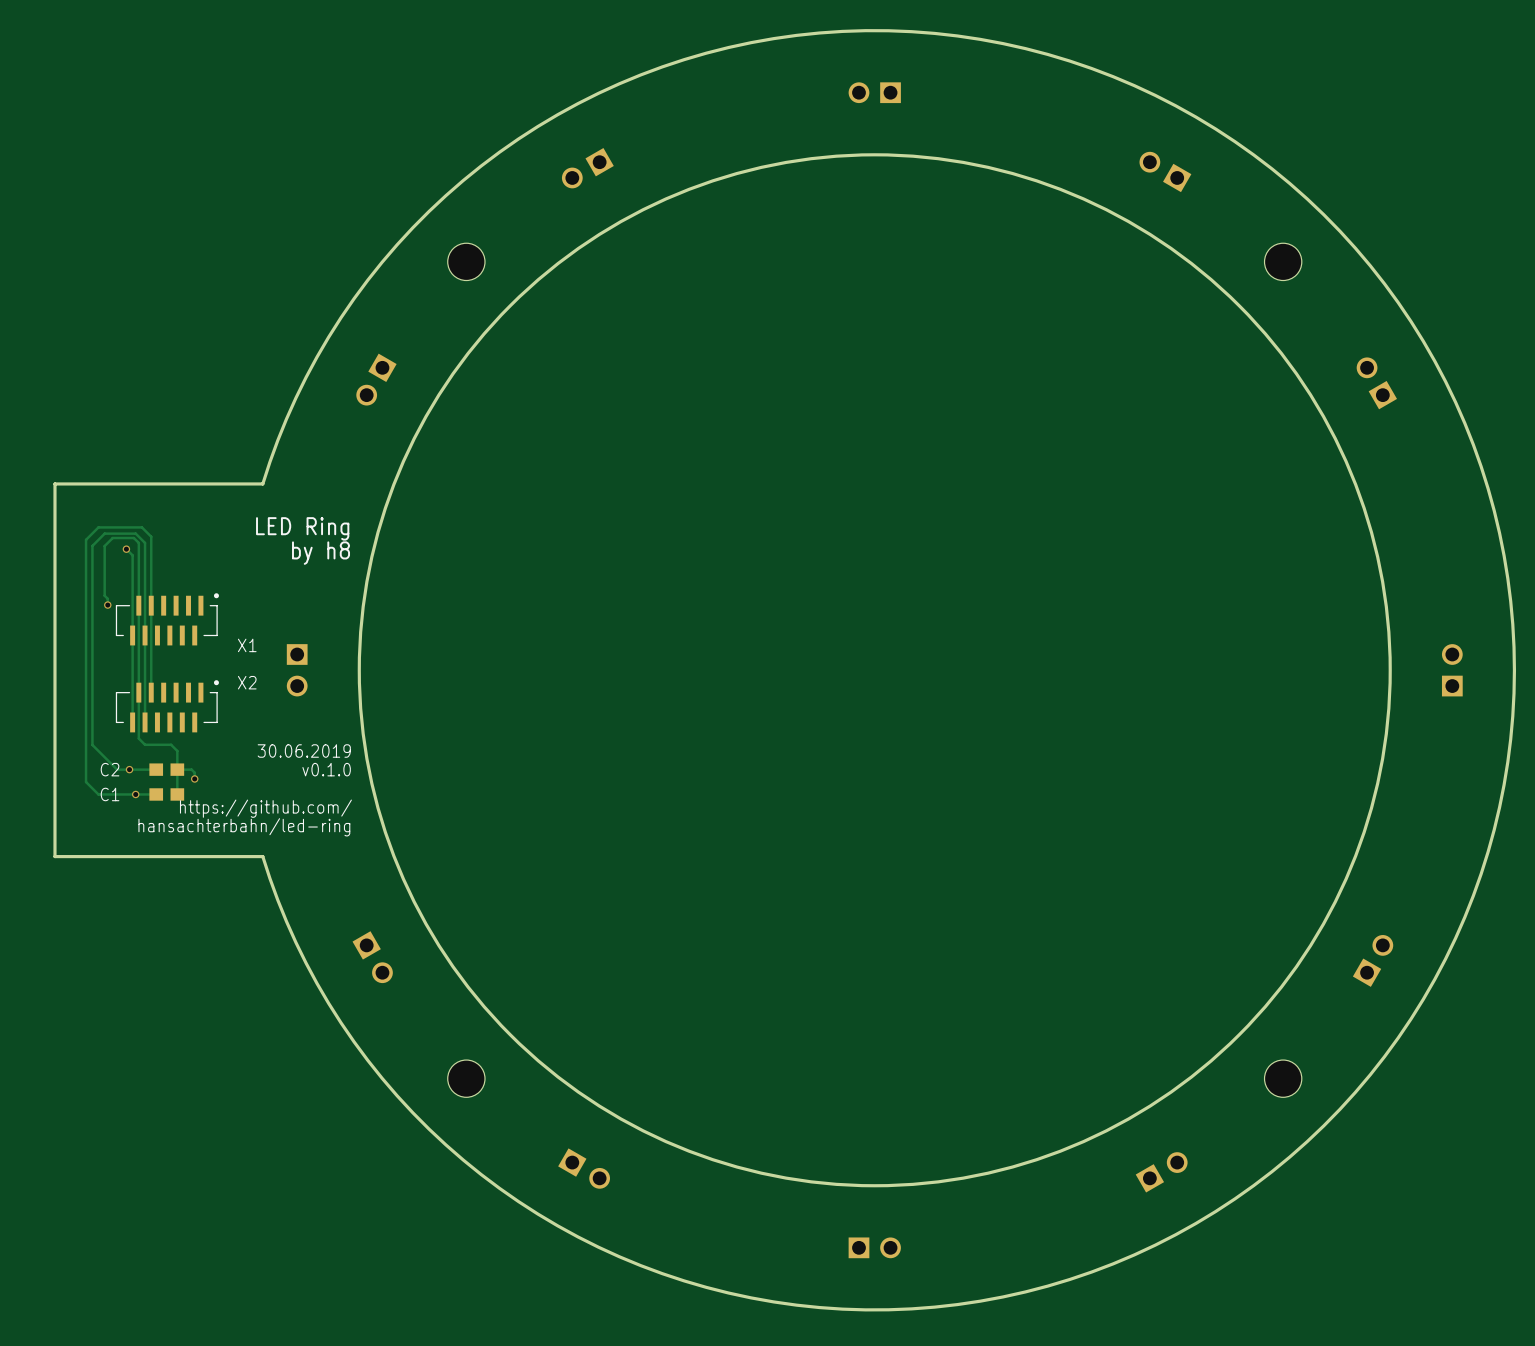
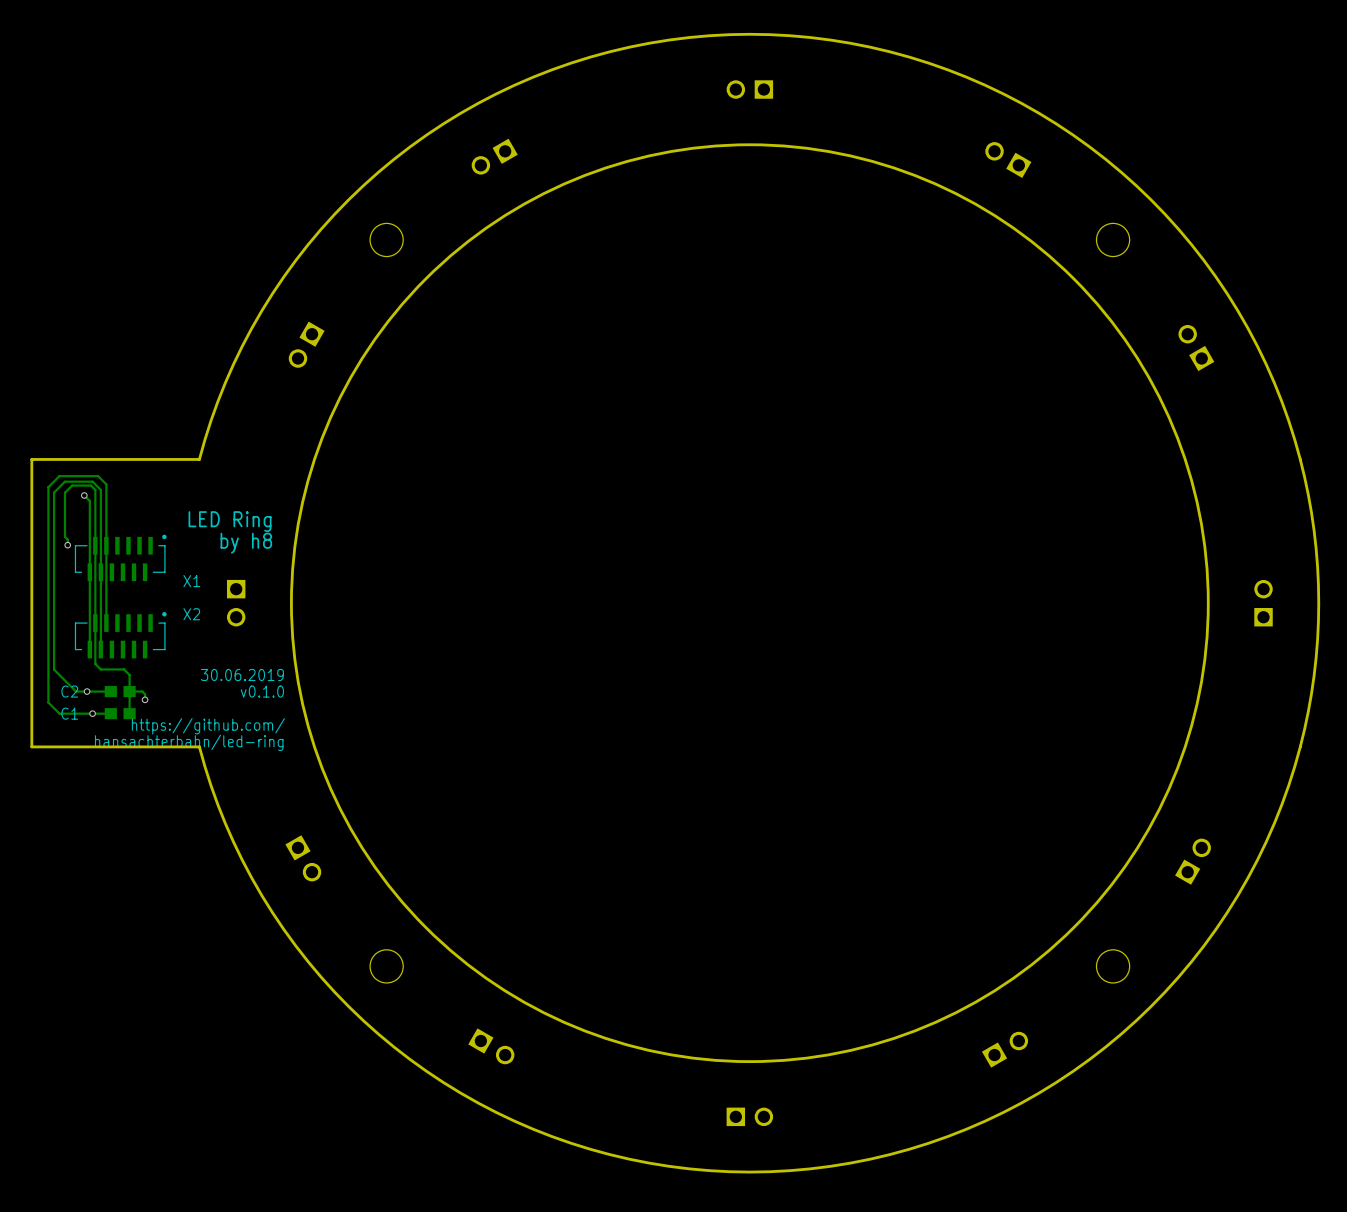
board edge: (262, 483) (54, 483) (54, 856) (262, 856) (286, 921) (317, 983) (341, 1022) (367, 1060) (412, 1112) (445, 1144) (481, 1174) (537, 1214) (598, 1247) (640, 1265) (684, 1280) (751, 1297) (796, 1305) (865, 1309) (934, 1307) (980, 1301) (1047, 1286) (1113, 1263) (1175, 1234) (1234, 1198) (1289, 1156) (1323, 1125) (1370, 1074) (1411, 1018) (1434, 979) (1464, 917) (1488, 852) (1504, 784) (1512, 716) (1514, 647) (1510, 601) (1504, 555) (1488, 488) (1464, 423) (1434, 361) (1411, 321) (1370, 265) (1323, 214) (1272, 168) (1215, 129) (1175, 105) (1113, 76) (1047, 54) (980, 39) (911, 31) (842, 31) (796, 35) (751, 42) (684, 59) (619, 83) (577, 103) (518, 139) (481, 166) (429, 211) (382, 262) (354, 298) (317, 357) (286, 419) (262, 483) -> (1300, 459) (1311, 512) (1317, 566) (1318, 621) (1314, 675) (1304, 729) (1288, 785) (1266, 841) (1237, 895) (1203, 945) (1164, 992) (1136, 1020) (1089, 1059) (1039, 1093) (985, 1121) (928, 1143) (870, 1159) (830, 1166) (770, 1171) (729, 1171) (669, 1166) (590, 1149) (533, 1129) (496, 1112) (443, 1082) (394, 1047) (348, 1006) (308, 961) (272, 912) (242, 860) (217, 804) (199, 746) (31, 746) (31, 459) (199, 459) (225, 382) (261, 310) (308, 244) (363, 185) (426, 135) (496, 93) (551, 69) (629, 47) (669, 40) (729, 34) (790, 35) (850, 43) (909, 57) (966, 77) (1003, 93) (1056, 123) (1089, 146) (1136, 185) (1164, 214) (1203, 260) (1227, 293) (1257, 346) (1281, 401) (1300, 459)
text position: LED Ring (302, 528) -> LED Ring (230, 521)
text position: by h8 (321, 553) -> by h8 (246, 543)

